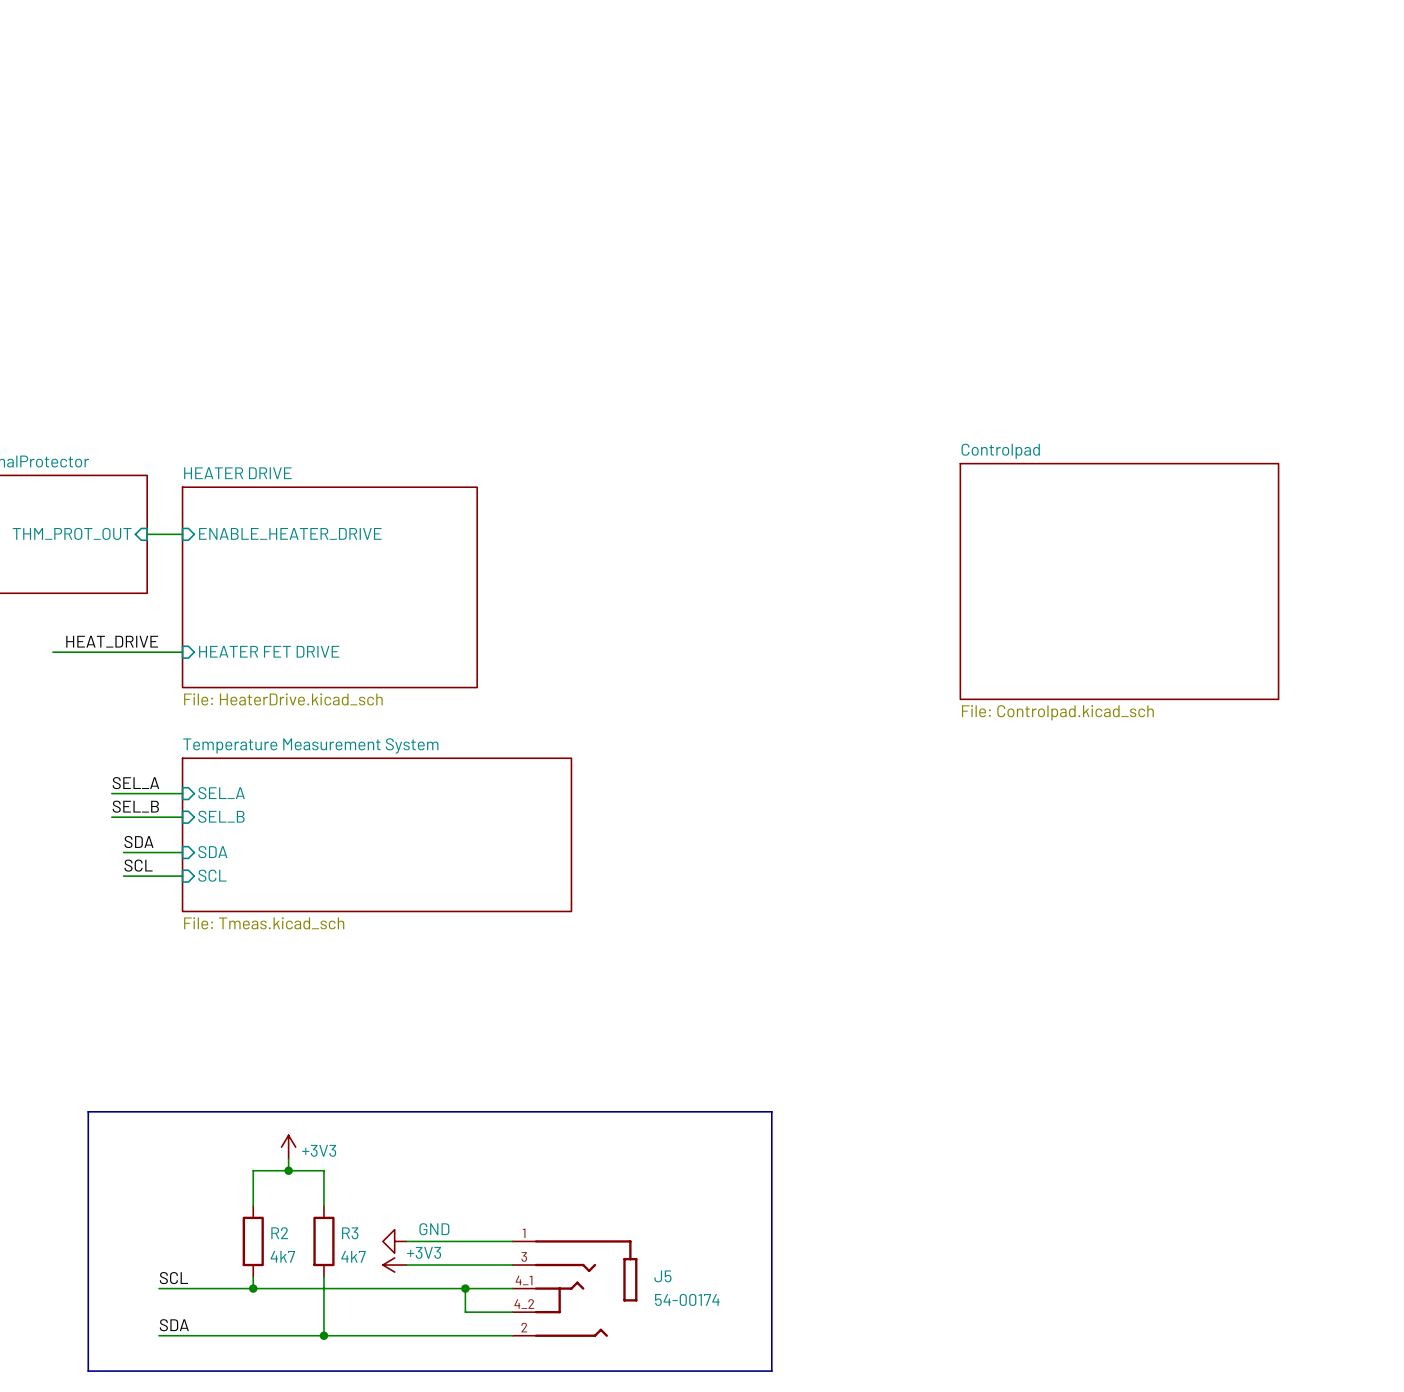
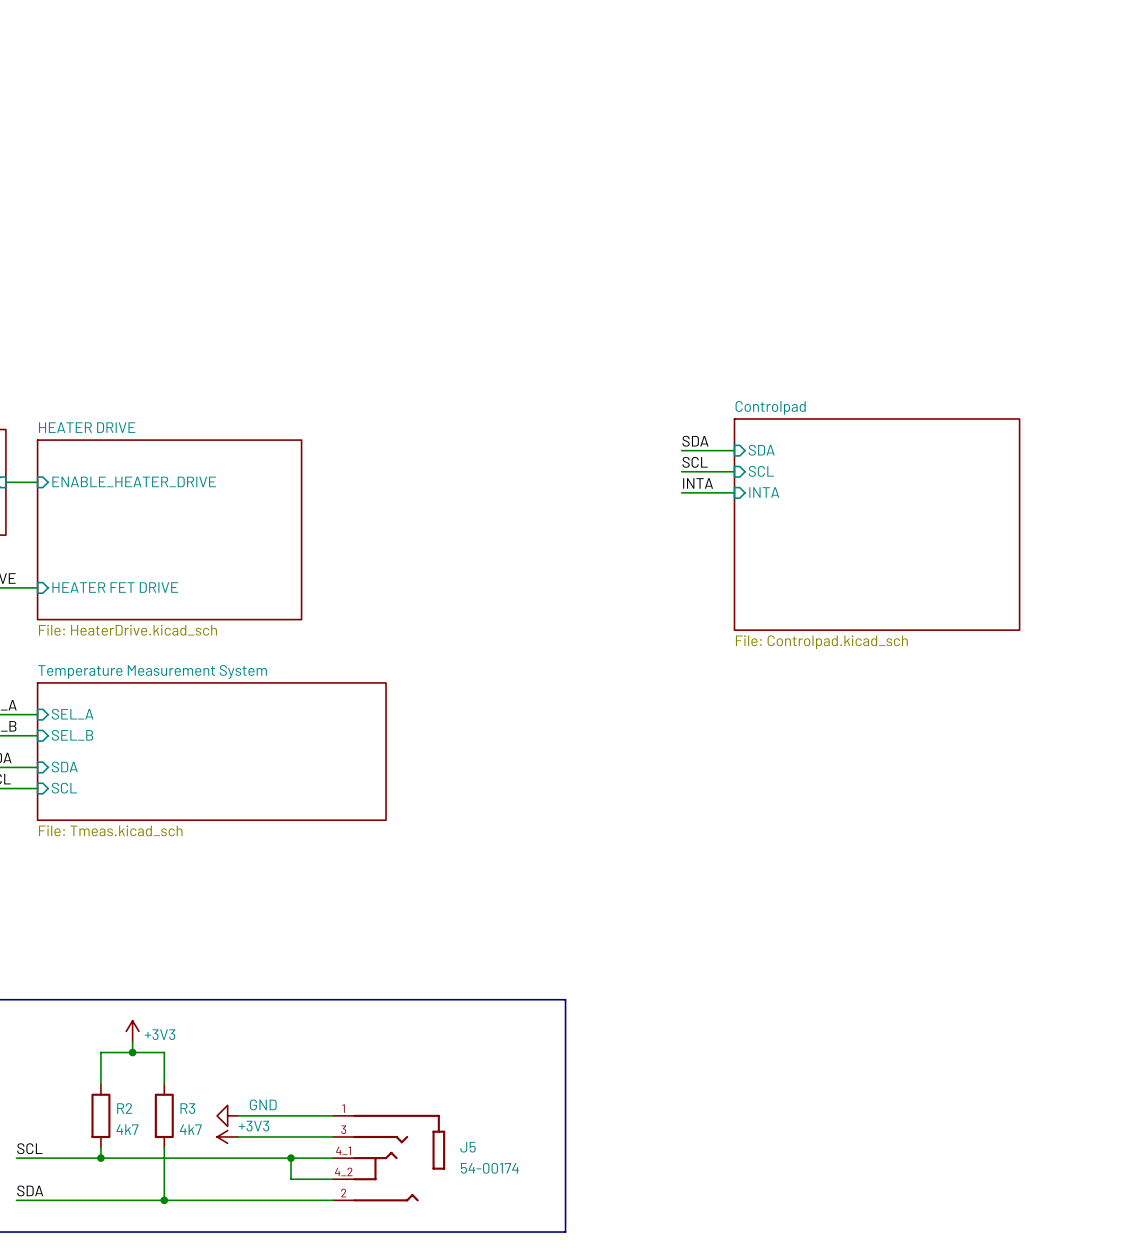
label: none -> SDA (695, 441)
wire: none -> (681, 450) (734, 450)
sheet pin: none -> SDA (761, 450)
label: none -> SCL (695, 462)
wire: none -> (681, 471) (734, 471)
sheet pin: none -> SCL (761, 471)
label: none -> INTA (698, 483)
sheet pin: none -> INTA (764, 492)
wire: none -> (681, 492) (734, 492)

